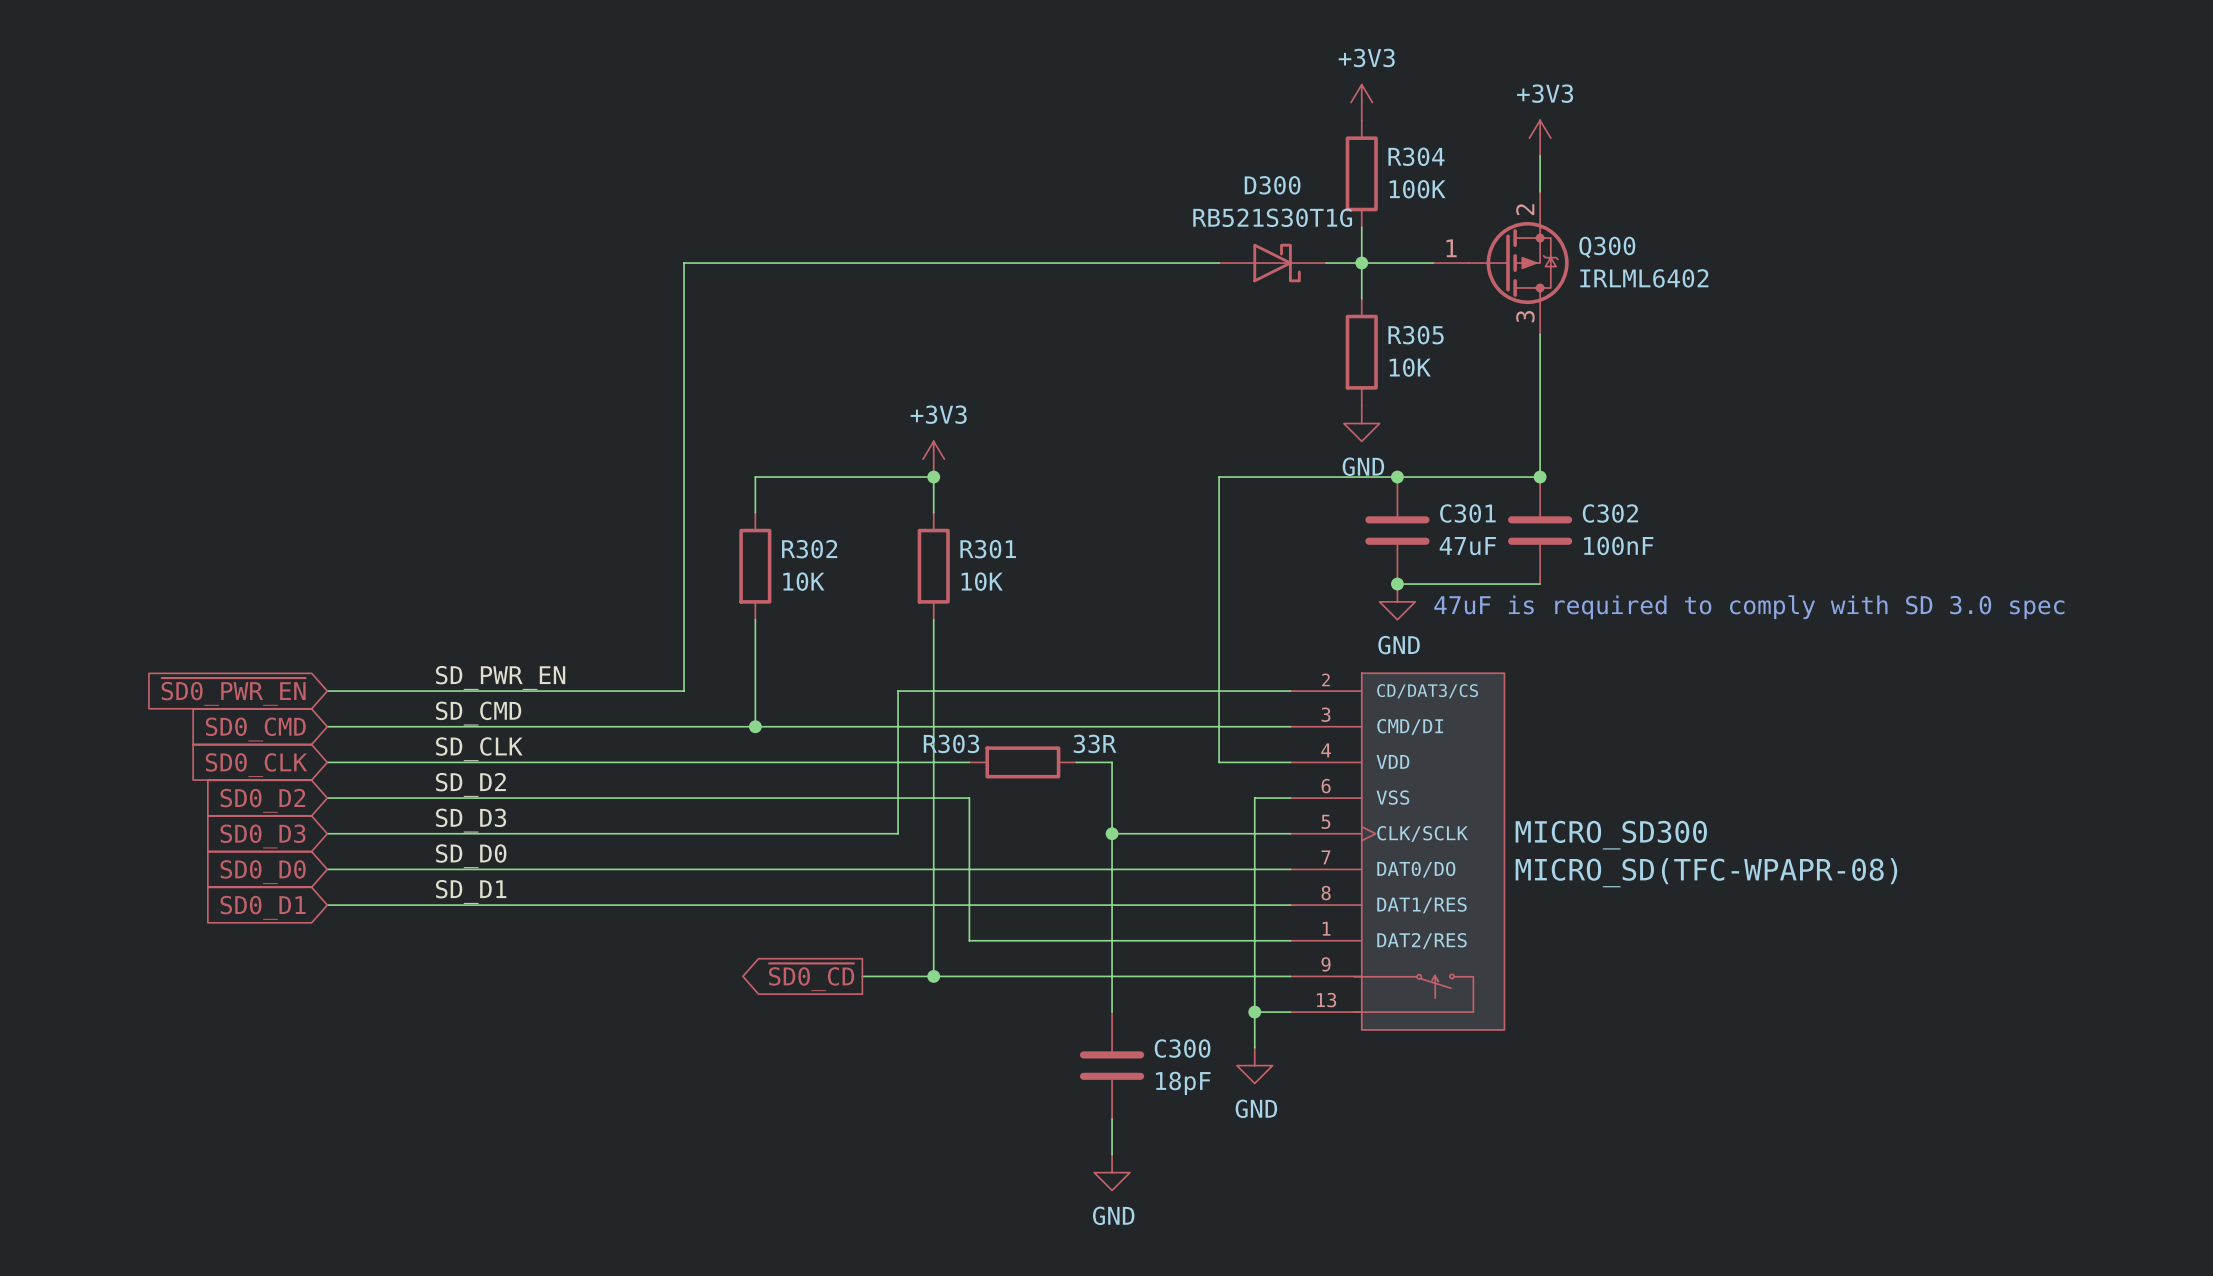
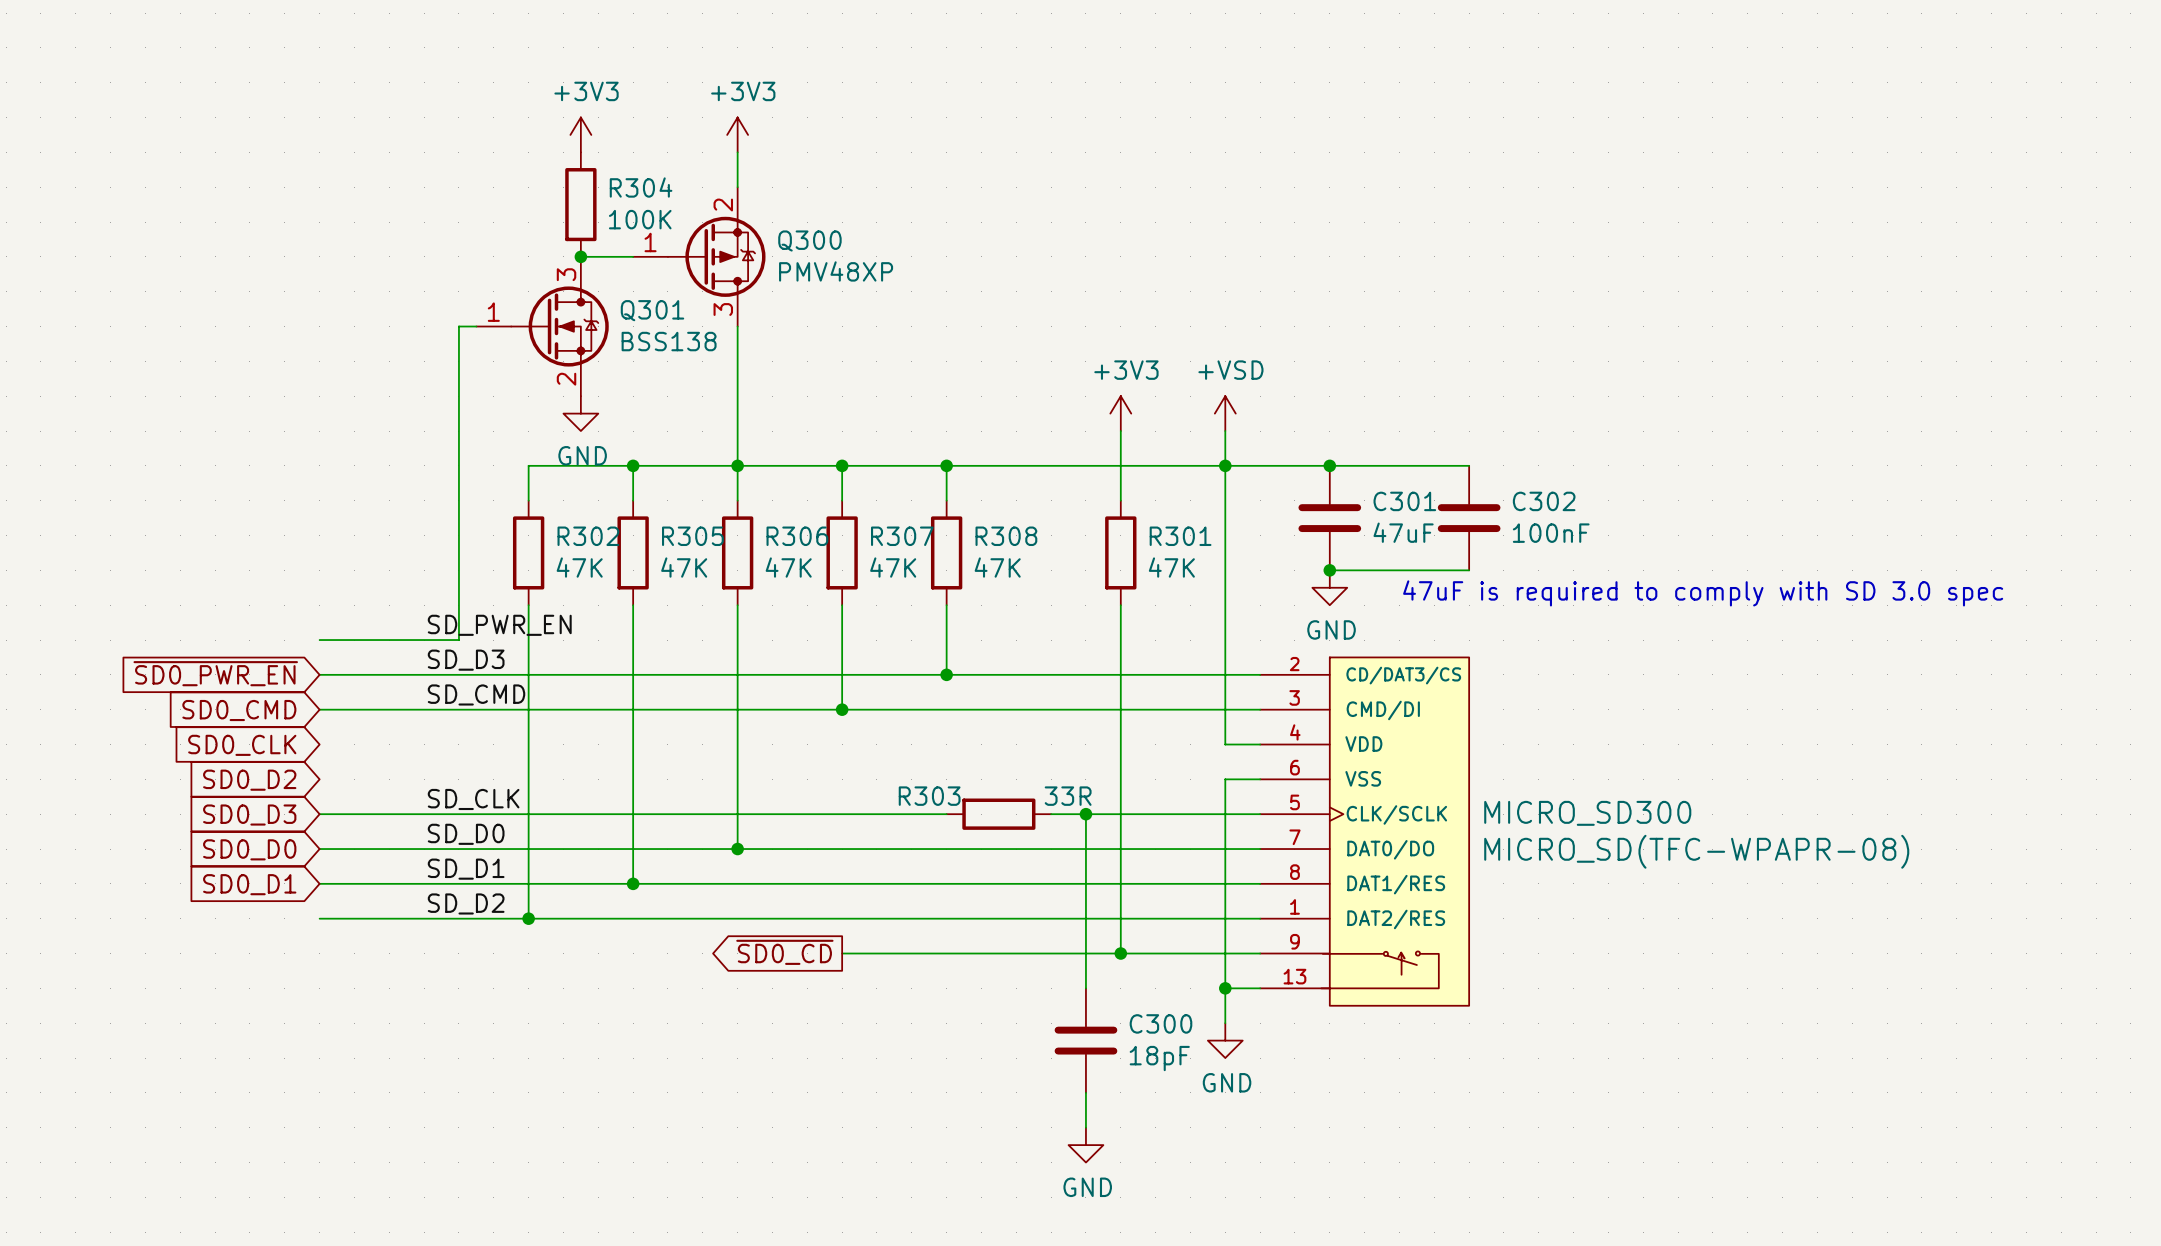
power symbol: +3V3 (1361, 102) -> none
power symbol: none -> +3V3 (580, 134)
power symbol: none -> +3V3 (737, 134)
power symbol: +3V3 (1540, 138) -> none
wire: none -> (737, 152) (737, 187)
wire: (1540, 156) (1540, 191) -> none
R304 position: (1361, 173) -> (580, 204)
wire: (1361, 227) (1361, 298) -> (1120, 431) (1120, 500)
wire: none -> (580, 256) (633, 256)
junction: none -> (580, 256)
wire: (1219, 263) (684, 263) (684, 691) -> (876, 674) (667, 674)
D300: RB521S30T1G (1272, 263) -> none
wire: (1326, 263) (1433, 263) -> none
junction: (1361, 263) -> none
Q300 position: (1500, 263) -> (699, 256)
Q300 value: IRLML6402 (1644, 278) -> PMV48XP (836, 271)
wire: none -> (476, 326) (458, 326) (458, 640) (319, 640)
Q301: none -> BSS138 (542, 326)
wire: none -> (737, 326) (737, 465) (528, 465) (528, 500)
wire: (1540, 334) (1540, 477) (1504, 477) -> none
R305 position: (1361, 352) -> (633, 552)
R305 value: 10K (1410, 367) -> 47K (684, 567)
power symbol: none -> GND (580, 413)
power symbol: none -> +3V3 (1120, 413)
power symbol: none -> +VSD (1225, 413)
power symbol: GND (1361, 423) -> none
power symbol: +3V3 (933, 459) -> none
wire: none -> (633, 465) (633, 500)
junction: none -> (633, 465)
junction: none -> (737, 465)
wire: none -> (842, 465) (842, 500)
junction: none -> (842, 465)
wire: (933, 477) (933, 512) -> (911, 465) (1190, 465)
junction: (933, 477) -> none
wire: none -> (946, 465) (946, 500)
junction: none -> (946, 465)
wire: (1219, 477) (1219, 762) (1254, 762) -> (1225, 431) (1225, 744)
junction: none -> (1225, 465)
junction position: (1397, 477) -> (1329, 465)
junction: (1540, 477) -> none
C301 position: (1397, 530) -> (1329, 518)
C302 position: (1540, 530) -> (1469, 518)
R302 name: R302 (809, 549) -> R306 (797, 536)
R302: none -> 47K (528, 552)
R307: none -> 47K (842, 552)
R301 position: (933, 566) -> (1120, 552)
R308: none -> 47K (946, 552)
R302 value: 10K (803, 581) -> 47K (788, 567)
R301 value: 10K (982, 581) -> 47K (1171, 567)
junction position: (1397, 584) -> (1329, 570)
wire: (1504, 584) (1540, 584) -> (1329, 570) (1364, 570)
power symbol position: GND (1397, 601) -> GND (1329, 587)
wire: none -> (528, 605) (528, 918)
wire: none -> (633, 605) (633, 883)
wire: none -> (842, 605) (842, 709)
wire: (933, 619) (933, 976) -> (1120, 605) (1120, 953)
wire: none -> (946, 605) (946, 674)
label: none -> SD_PWR_EN (499, 625)
label: SD_PWR_EN (500, 677) -> SD_D3 (466, 660)
wire: (898, 691) (898, 833) -> (946, 814) (876, 814)
junction: none -> (946, 674)
wire: none -> (737, 709) (737, 849)
junction: (755, 726) -> none
junction: none -> (842, 709)
label: SD_CLK (479, 749) -> none
wire: (327, 762) (969, 762) -> none
R303 position: (1022, 762) -> (998, 814)
wire: (1076, 762) (1112, 762) (1112, 833) -> (1051, 814) (1085, 814)
label position: SD_D2 (470, 784) -> SD_D2 (466, 903)
wire: (327, 798) (969, 798) (969, 940) -> (319, 918) (946, 918)
label: SD_D3 (471, 820) -> SD_CLK (473, 799)
junction: none -> (737, 849)
junction: none -> (633, 883)
junction: none -> (528, 918)
junction: (933, 976) -> none
junction: none -> (1120, 953)

